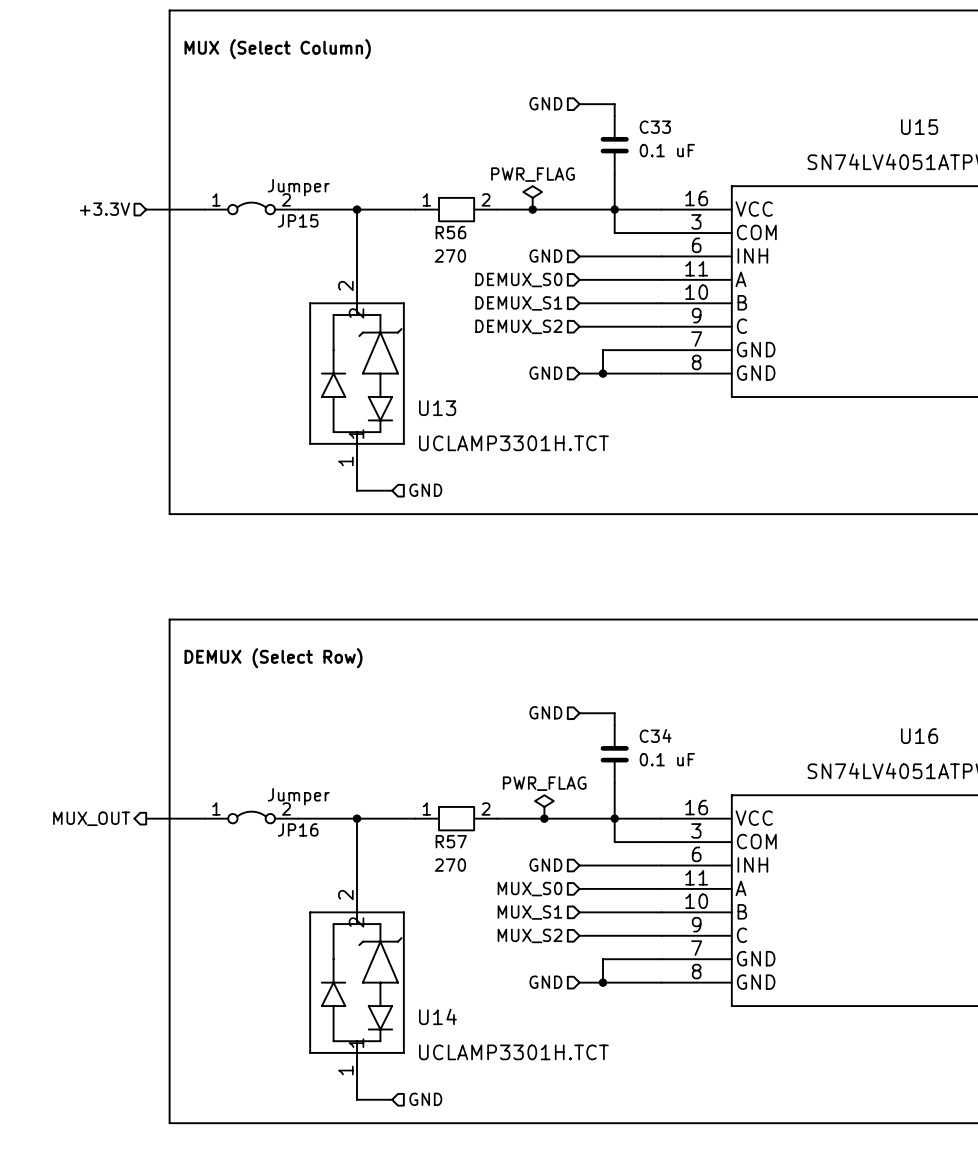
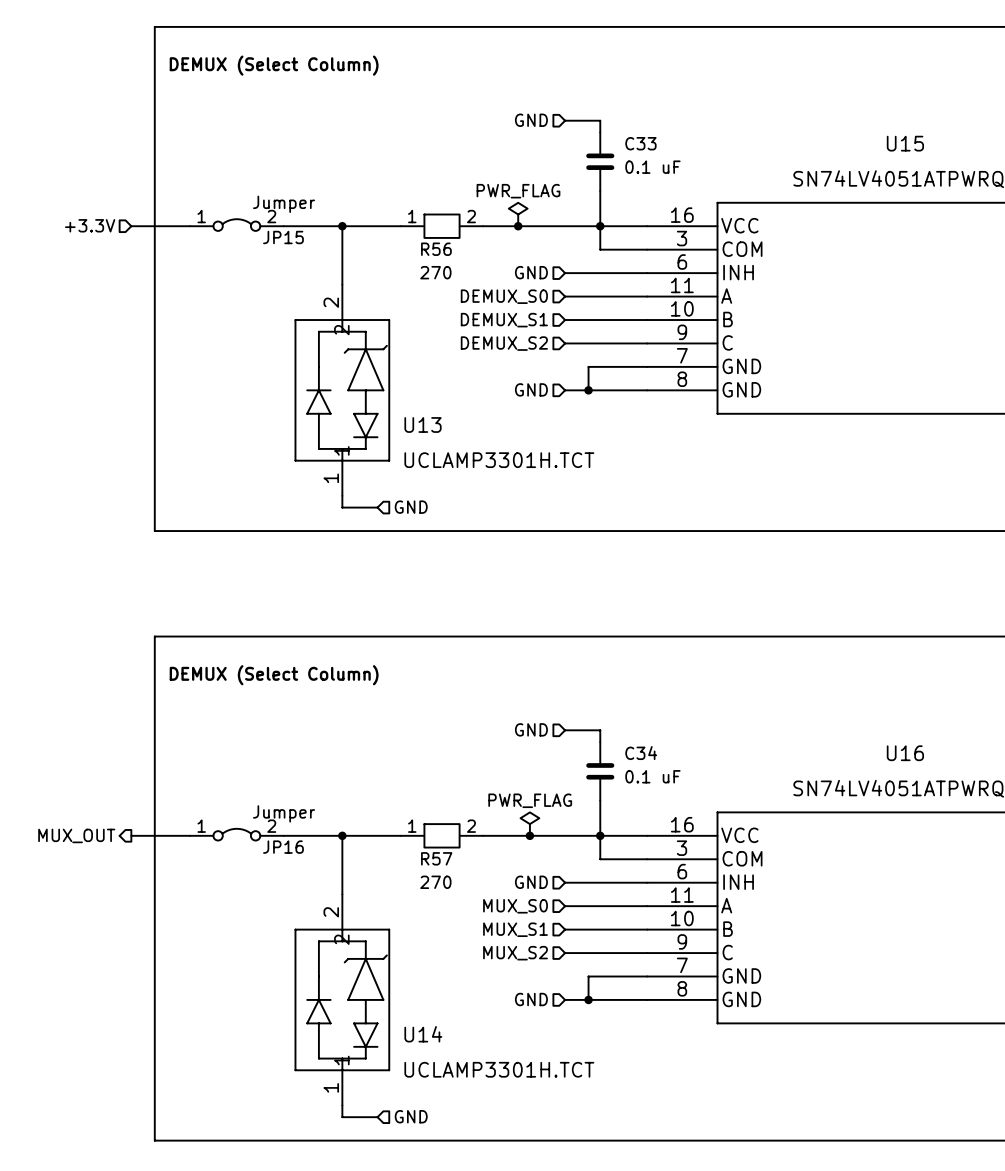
text: MUX (Select Column) (277, 49) -> DEMUX (Select Column) (274, 65)
text: DEMUX (Select Row) (273, 658) -> DEMUX (Select Column) (274, 675)

